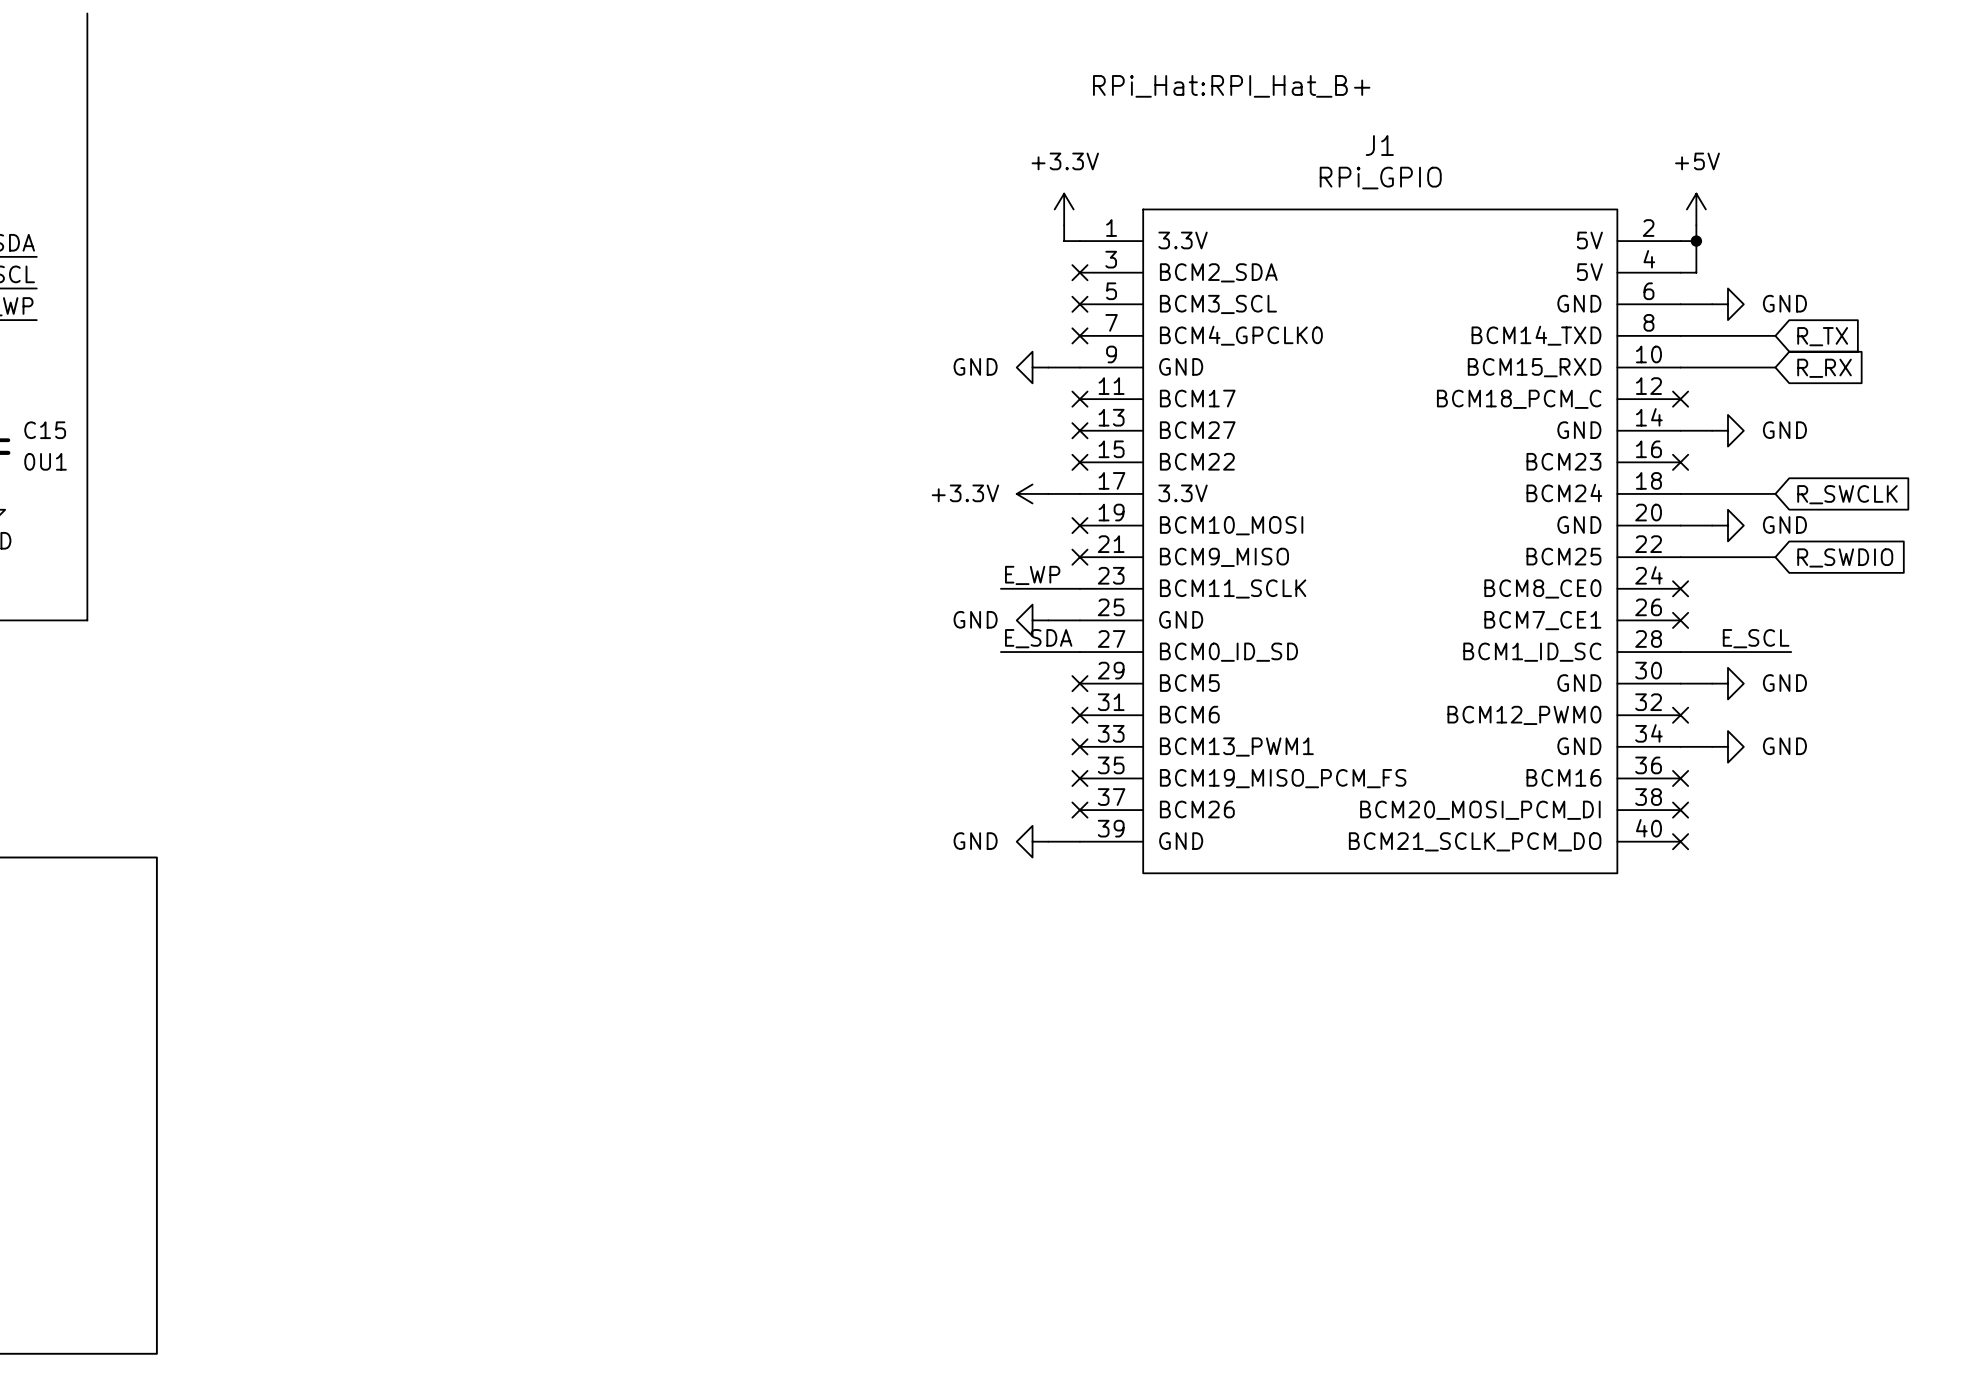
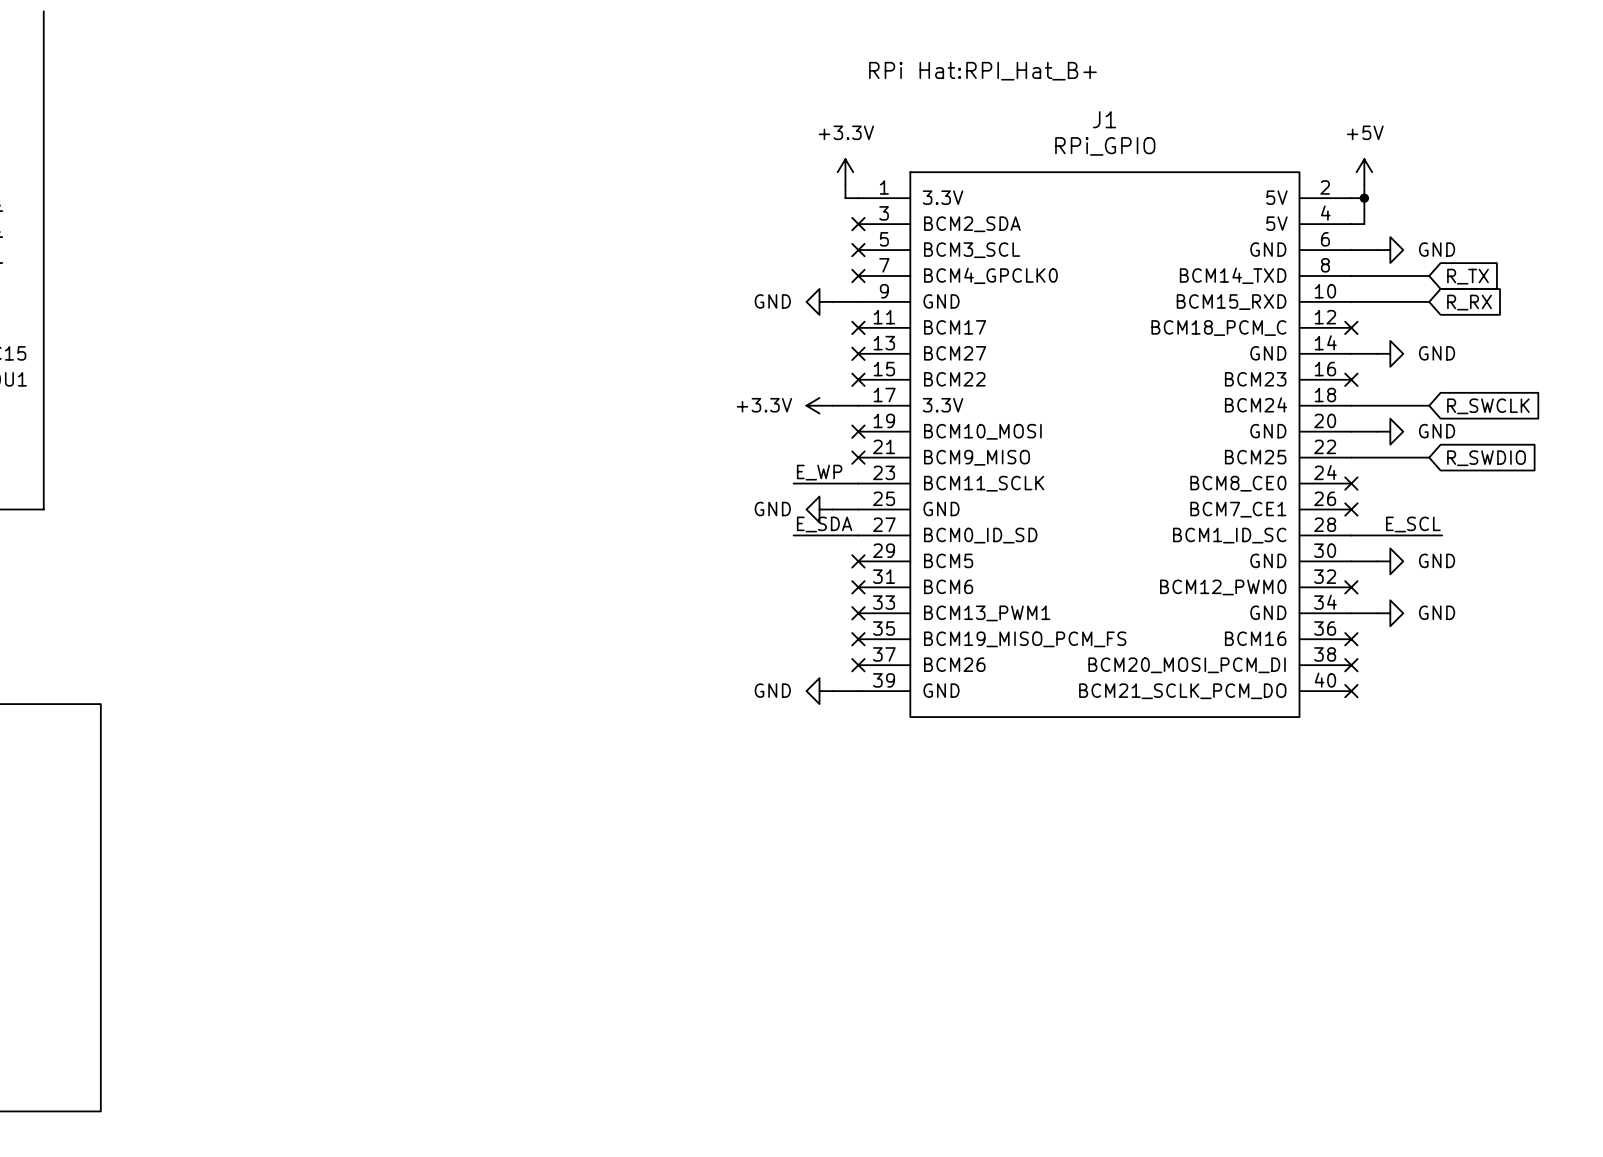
J1 text: RPi_Hat:RPI_Hat_B+ (1231, 86) -> RPi Hat:RPI_Hat_B+ (982, 71)

